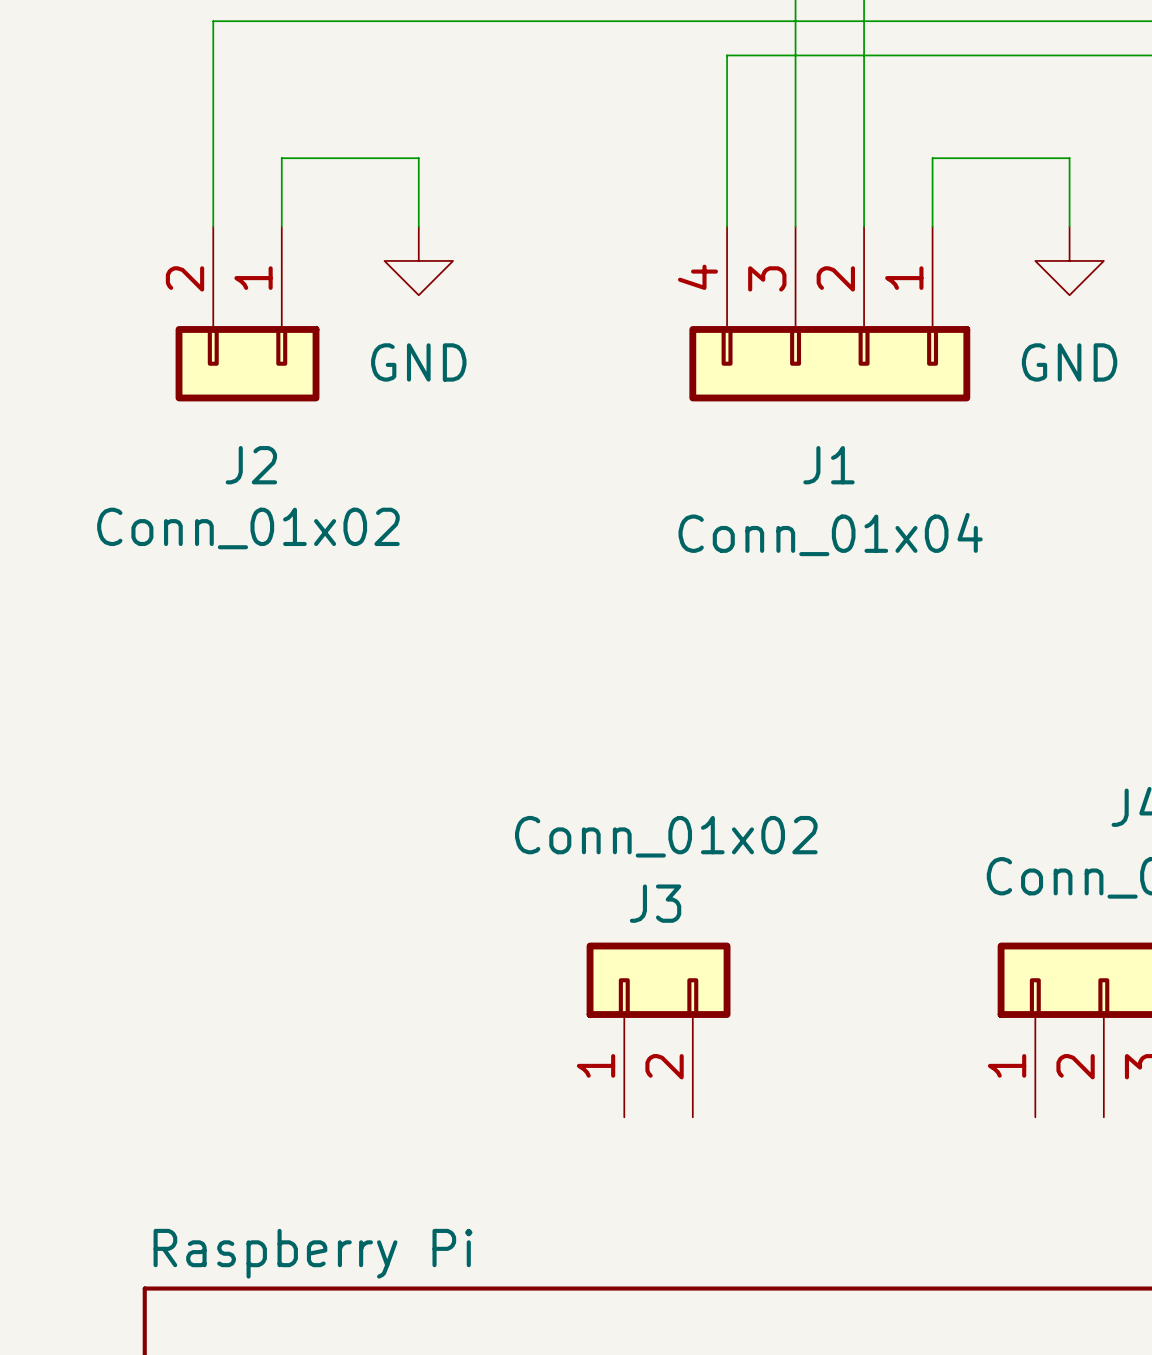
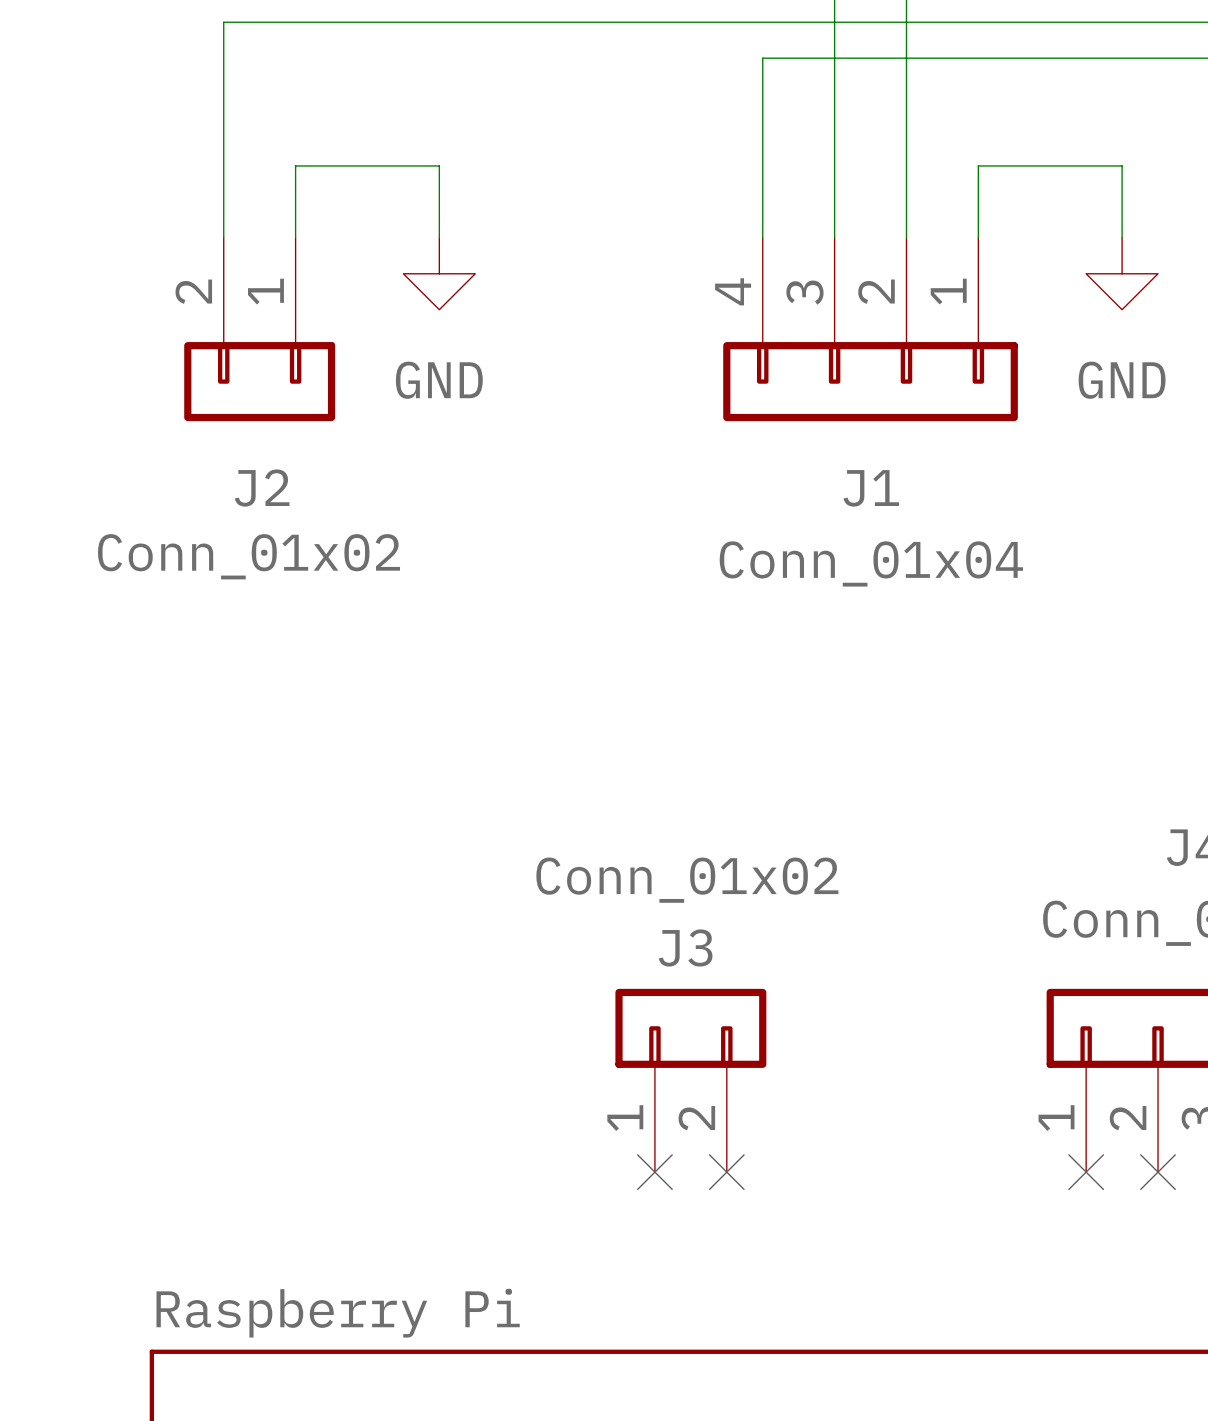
no-connect mark: none -> (654, 1172)
no-connect mark: none -> (726, 1172)
no-connect mark: none -> (1086, 1172)
no-connect mark: none -> (1158, 1172)

